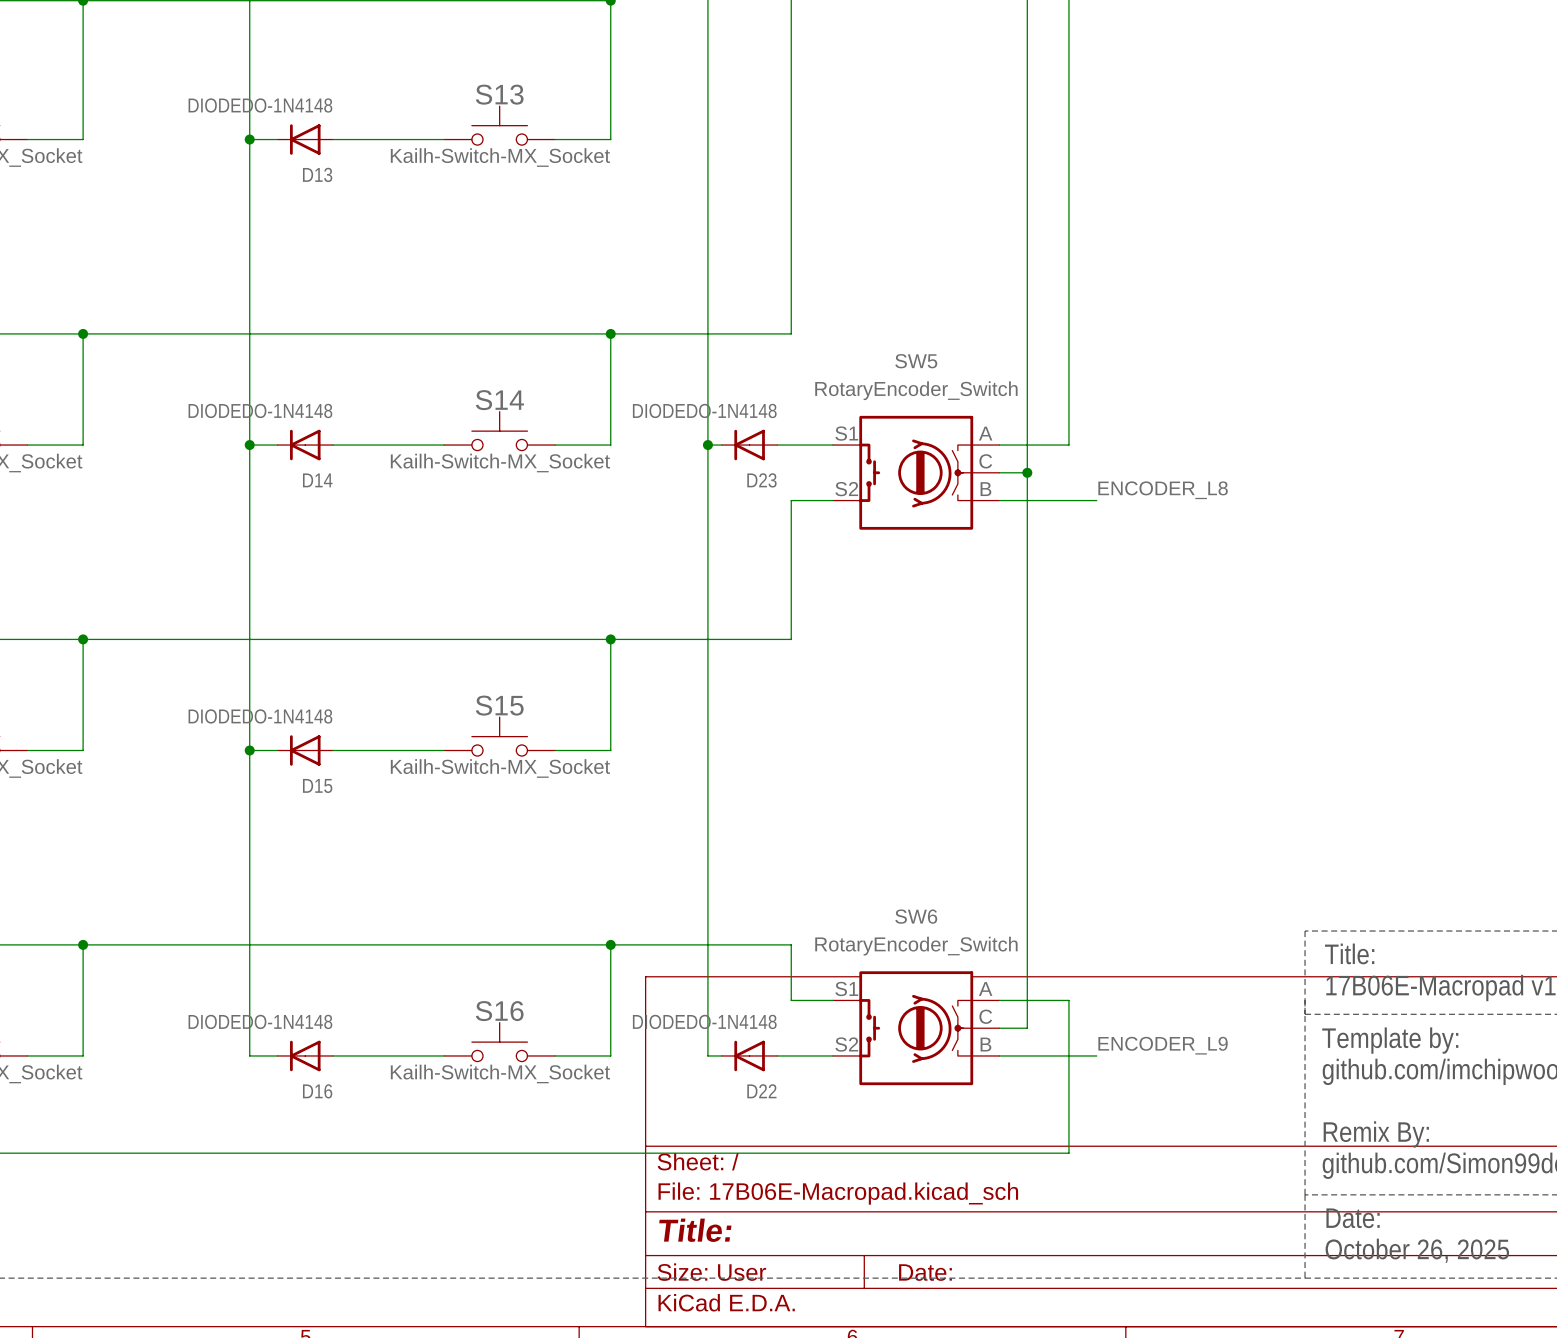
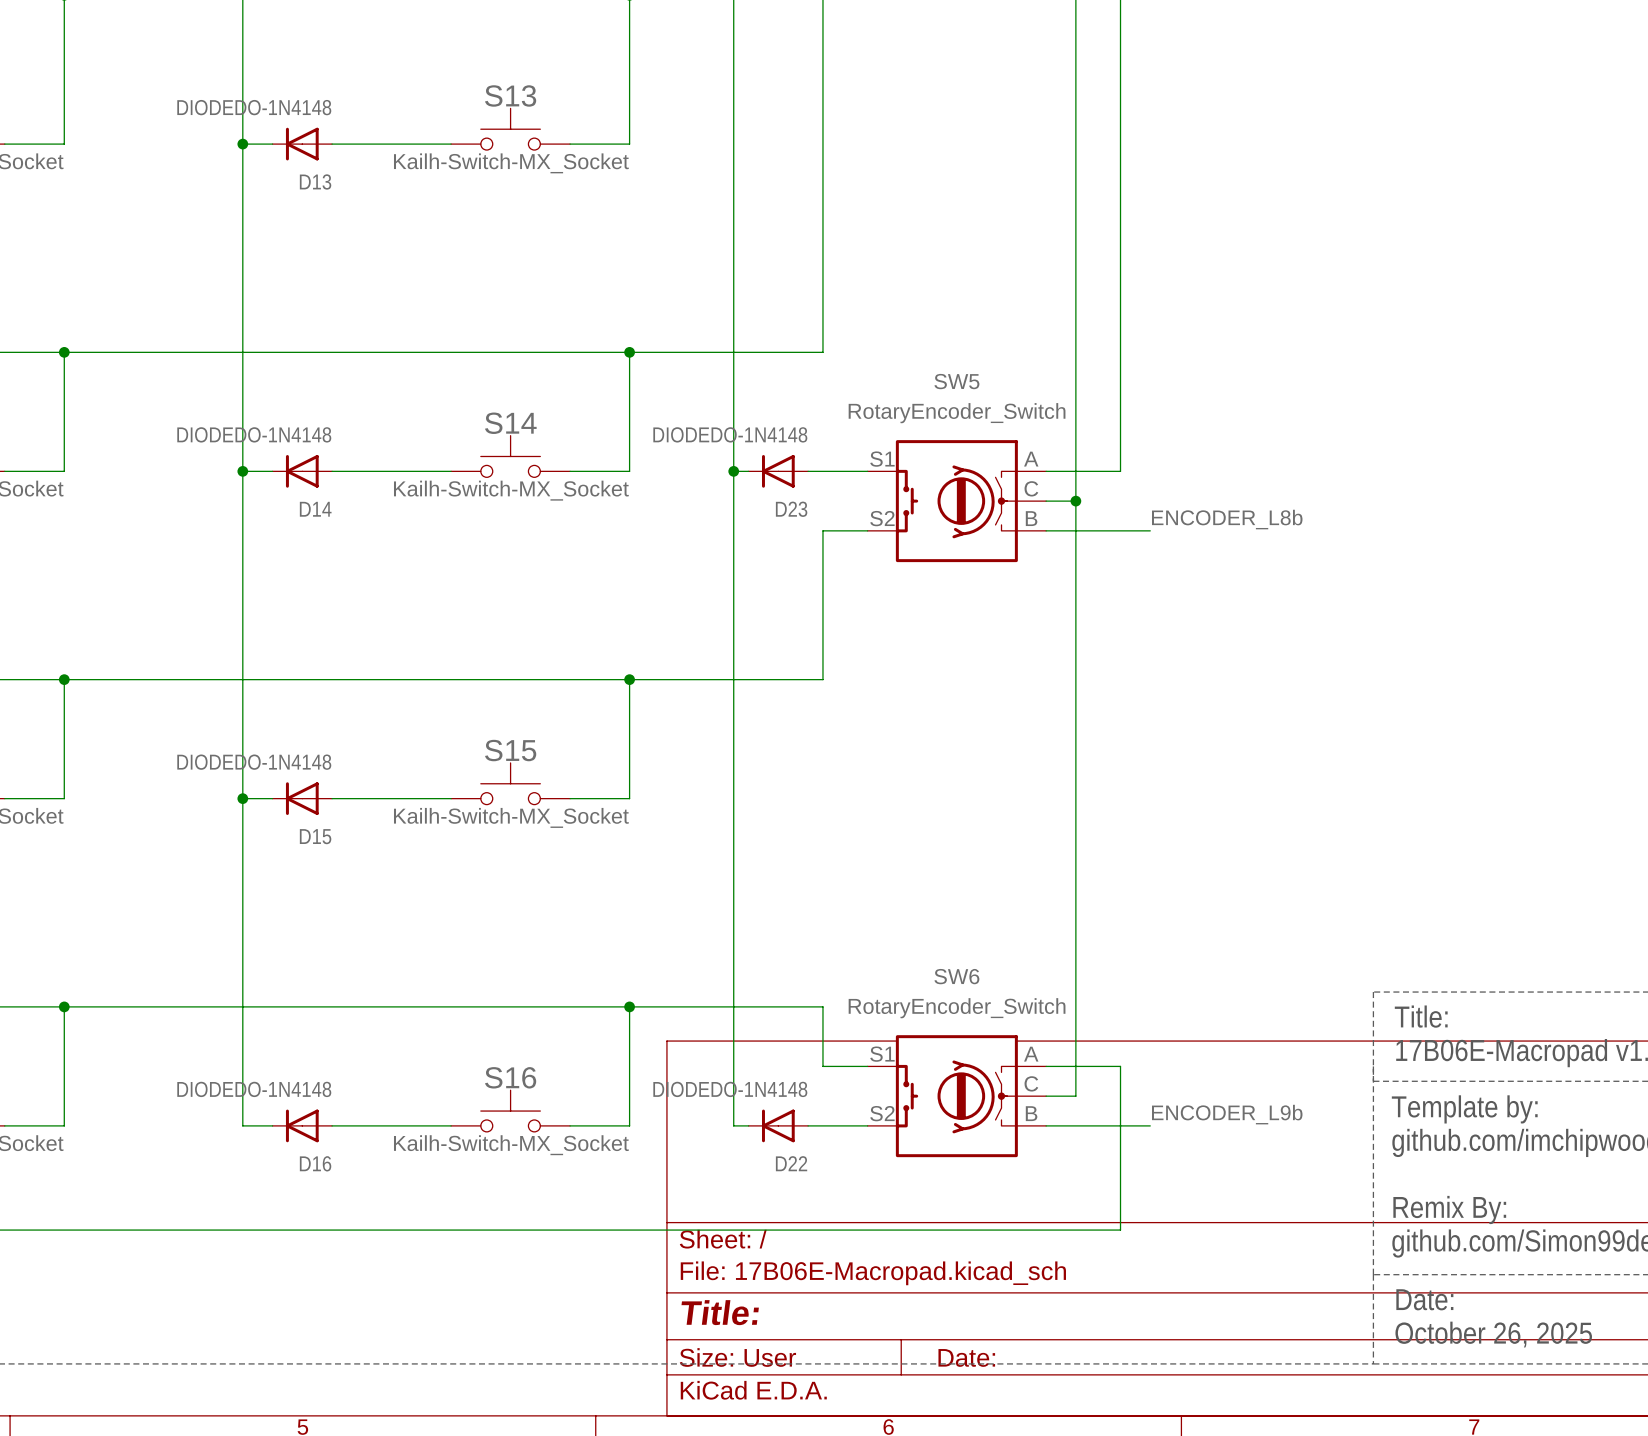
label: ENCODER_L8 (1163, 490) -> ENCODER_L8b (1227, 519)
label: ENCODER_L9 (1163, 1045) -> ENCODER_L9b (1227, 1114)

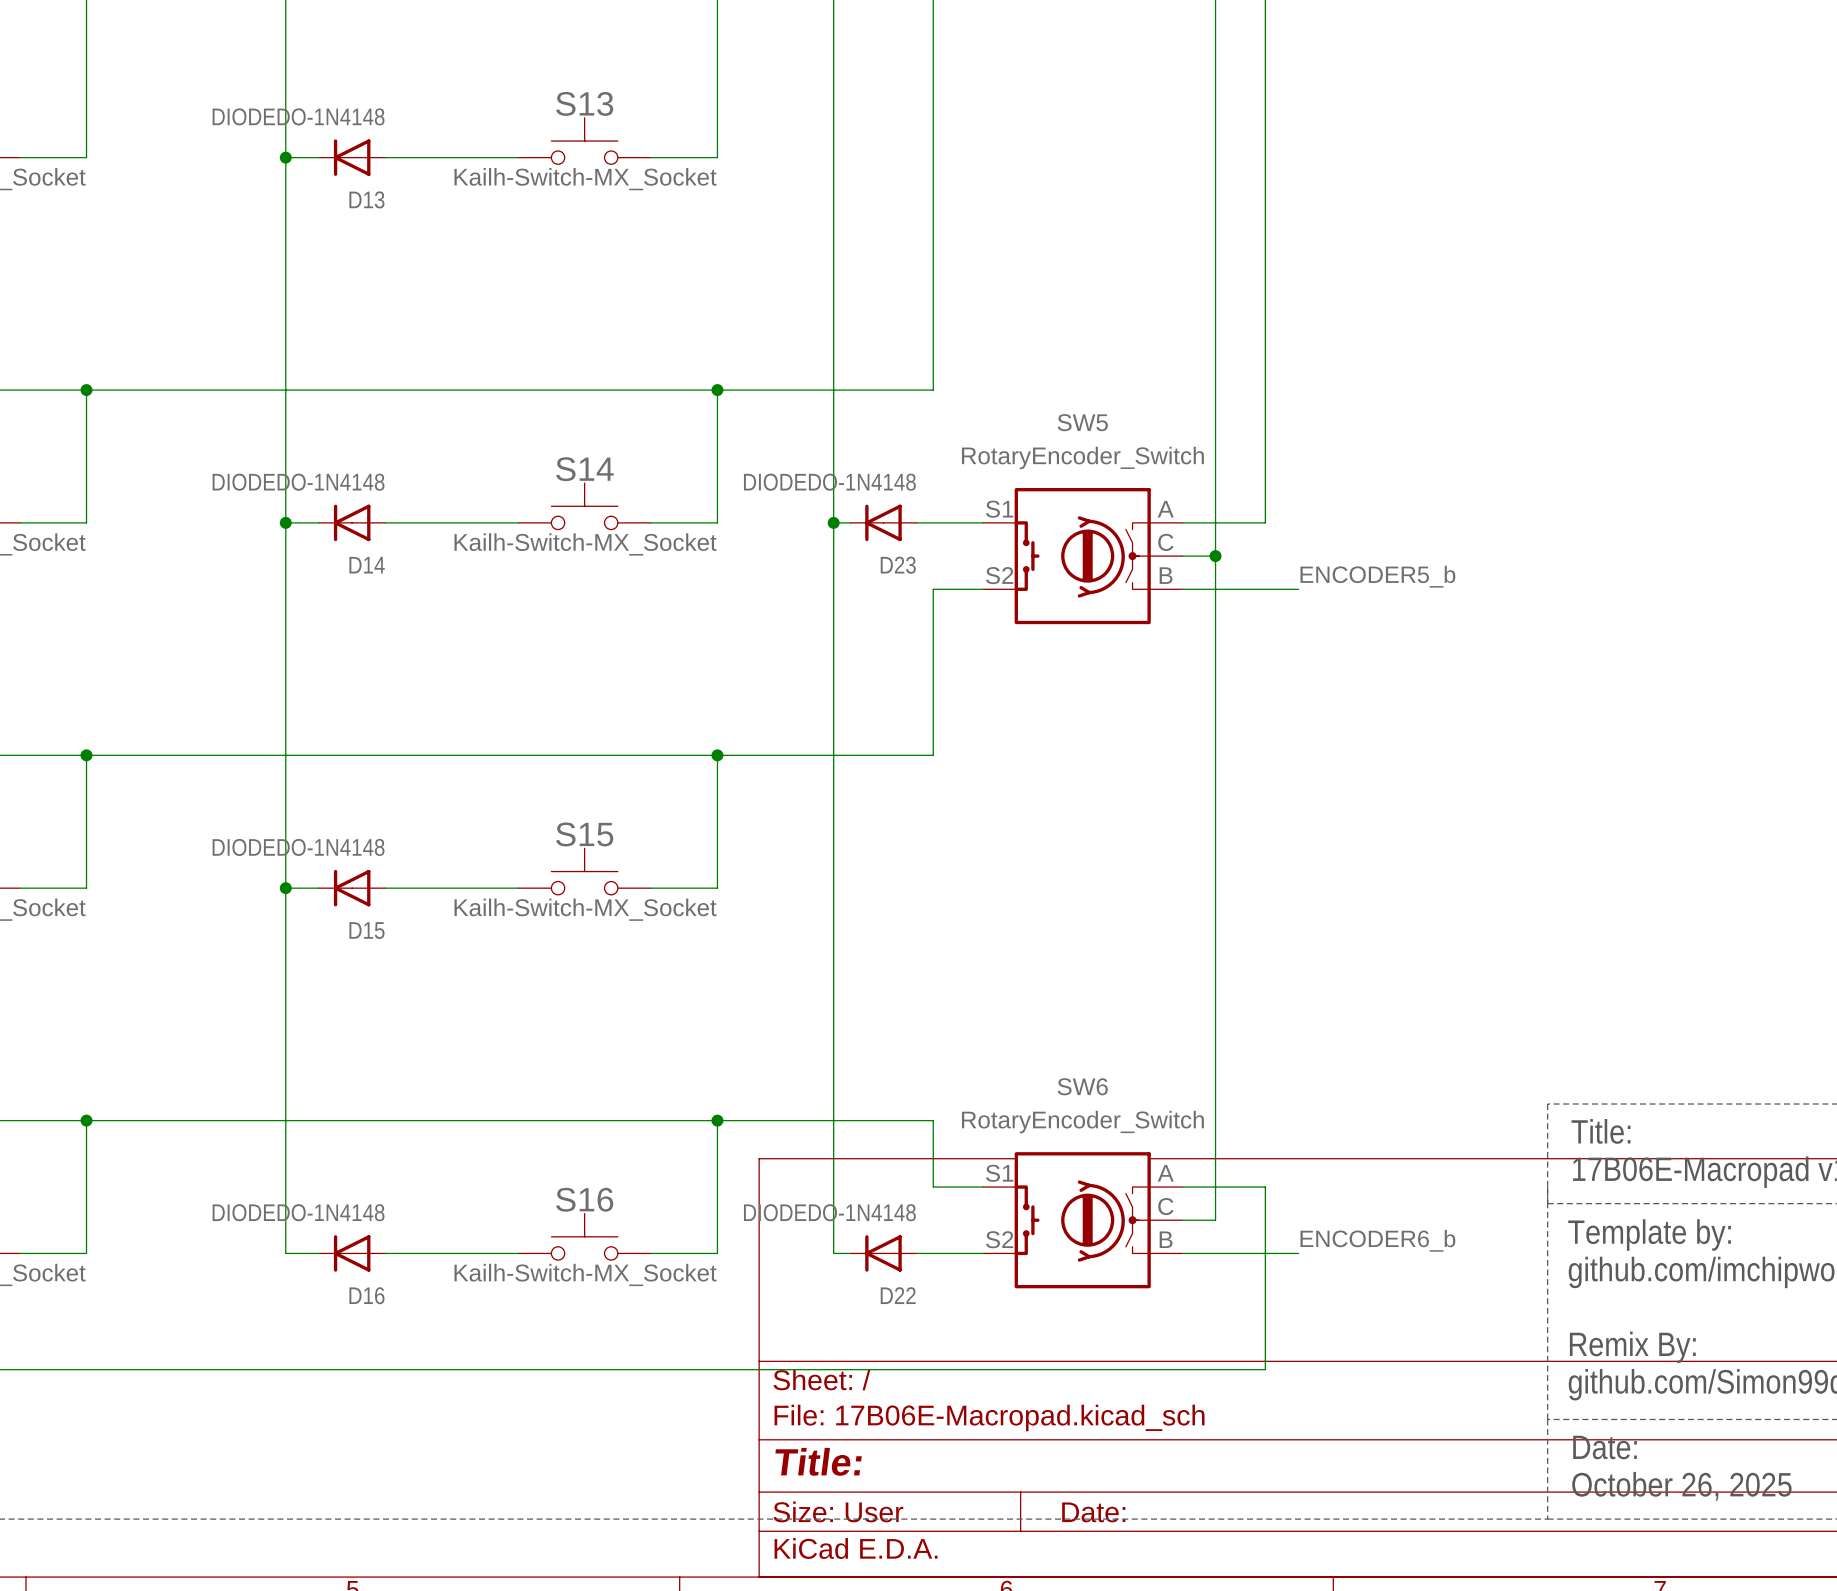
label: ENCODER_L8b (1227, 519) -> ENCODER5_b (1377, 576)
label: ENCODER_L9b (1227, 1114) -> ENCODER6_b (1377, 1240)

